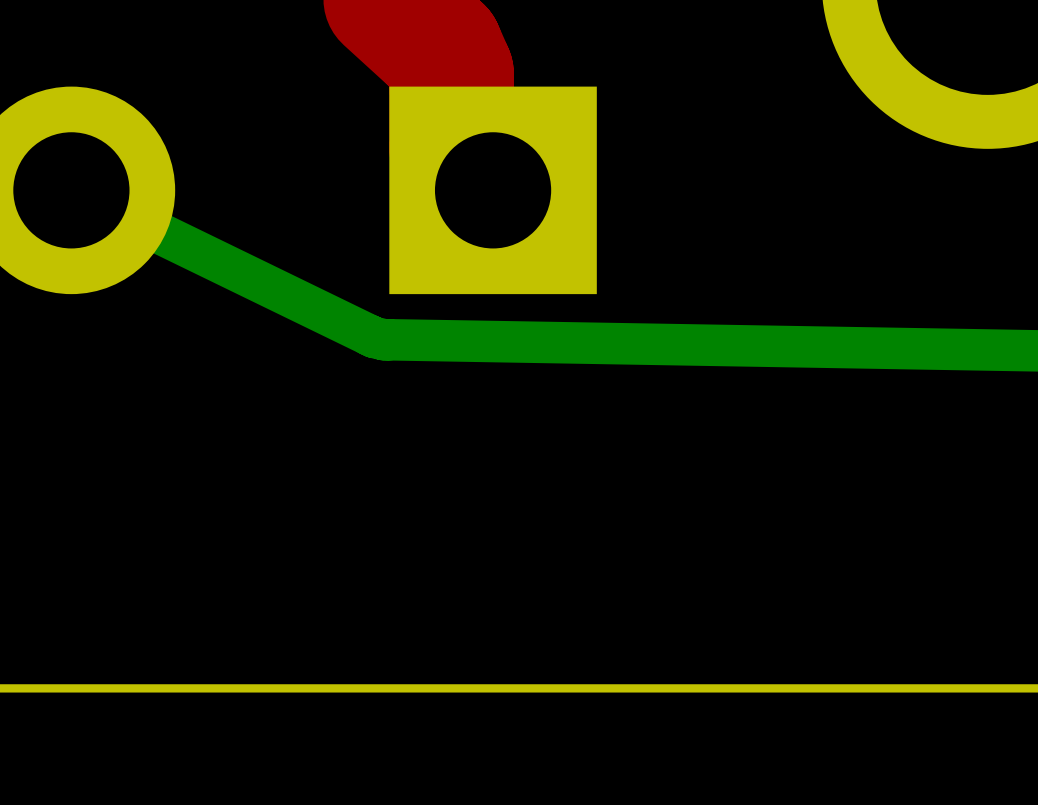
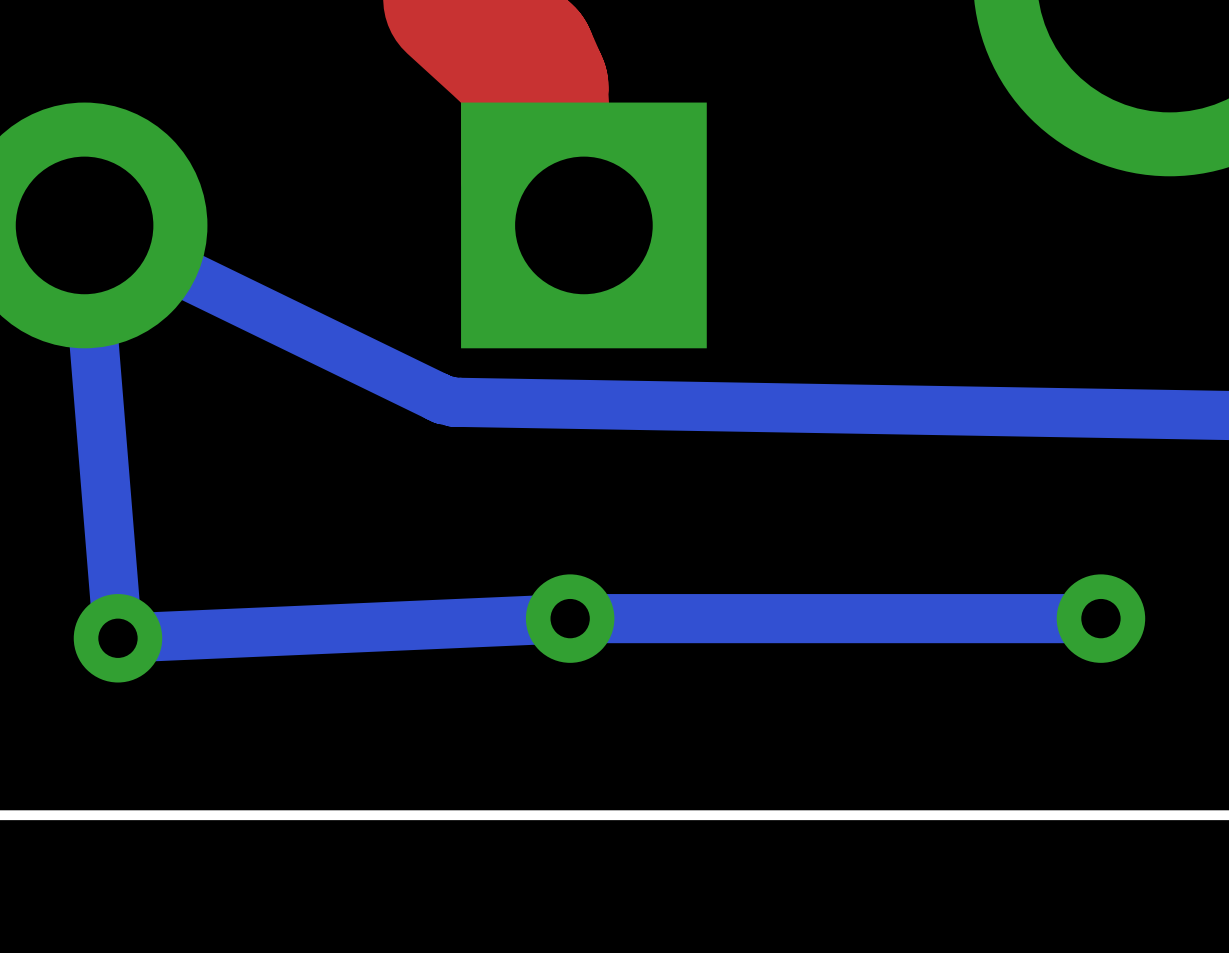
bottom track: none -> (84, 225) (117, 638) (570, 618) (1100, 618)
via: none -> (570, 618)
via: none -> (1100, 618)
via: none -> (117, 638)

